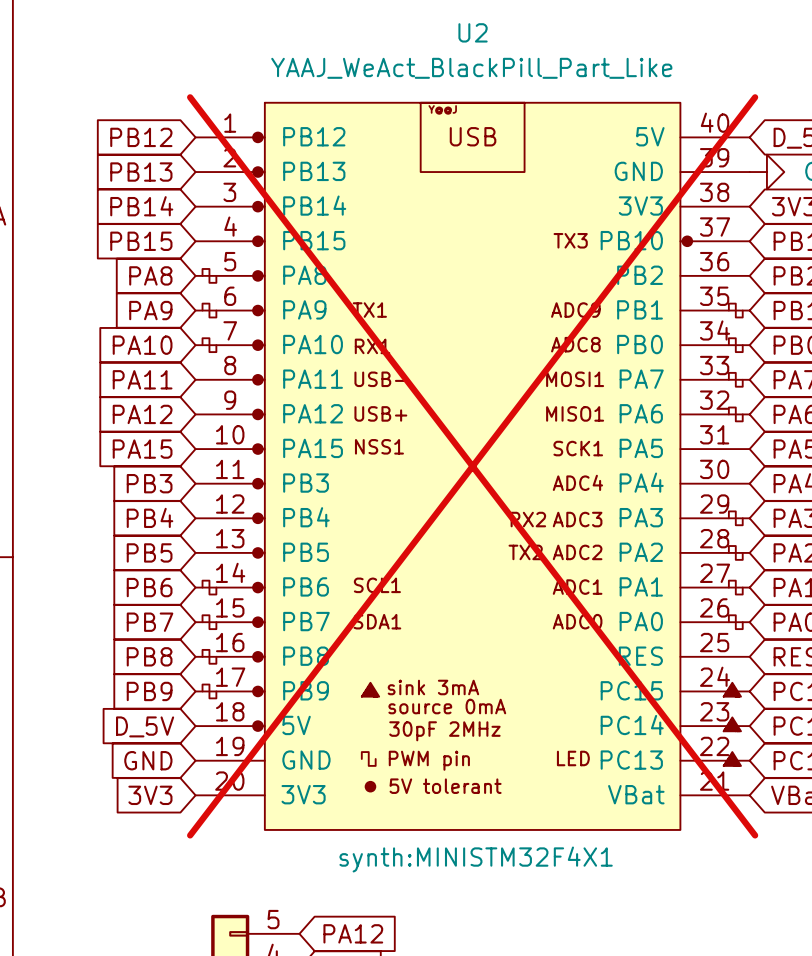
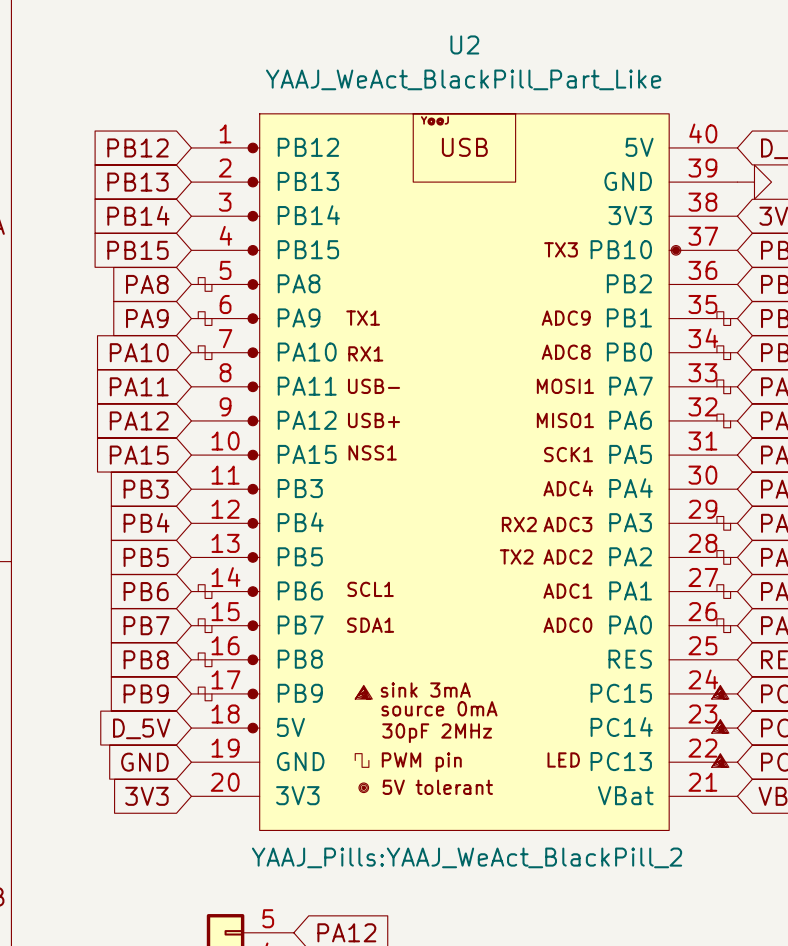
U2 do-not-place cross: (472, 466) -> none
U2 text: synth:MINISTM32F4X1 (476, 859) -> YAAJ_Pills:YAAJ_WeAct_BlackPill_2 (467, 857)

